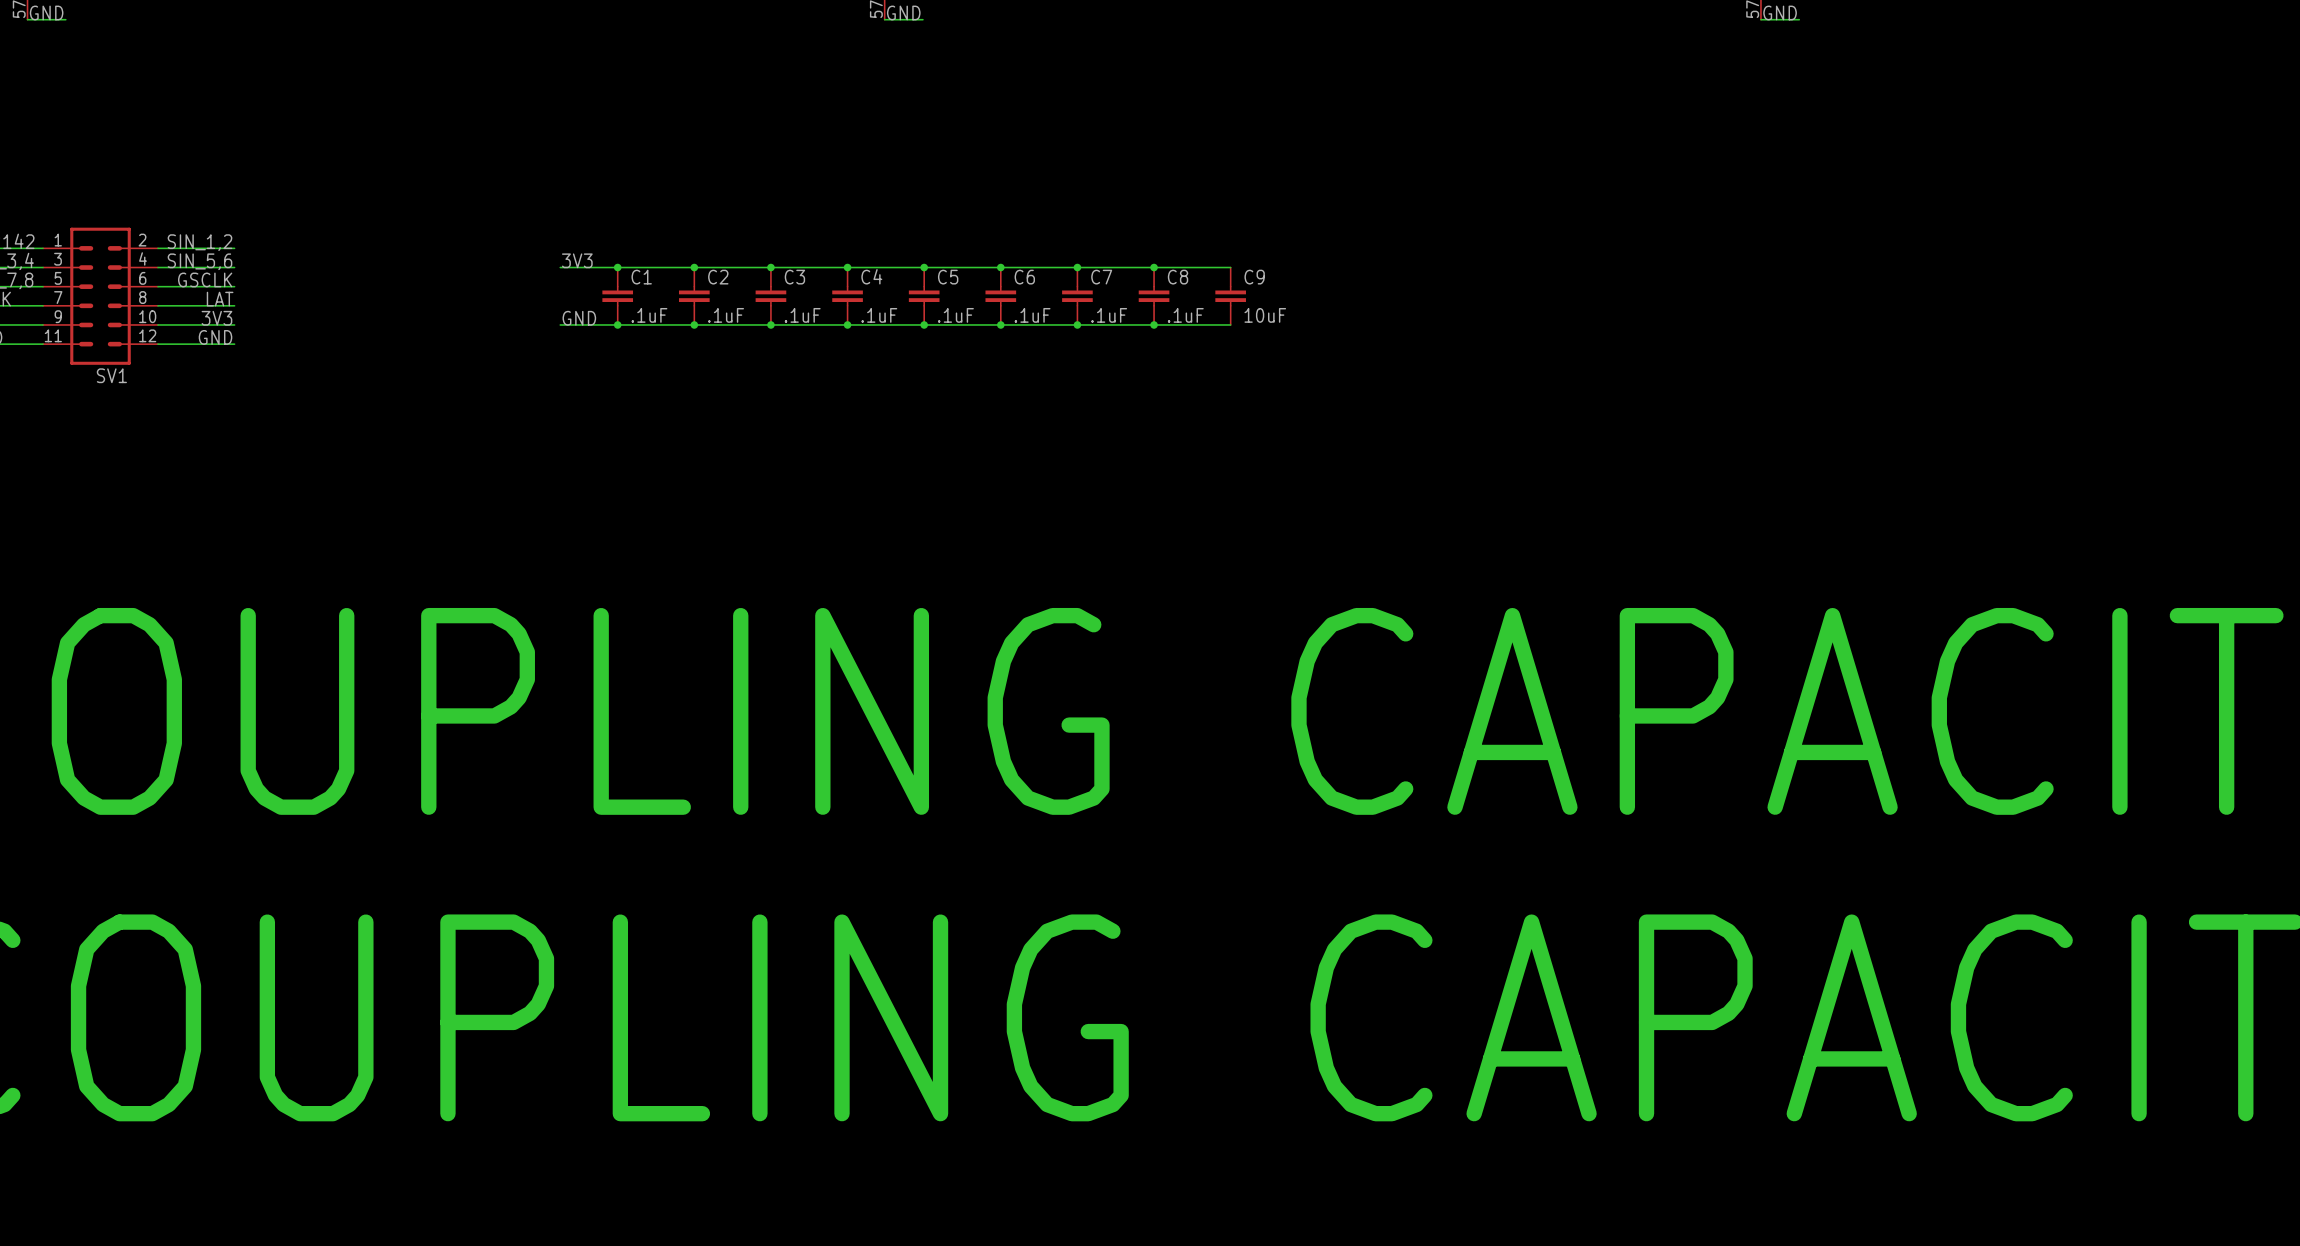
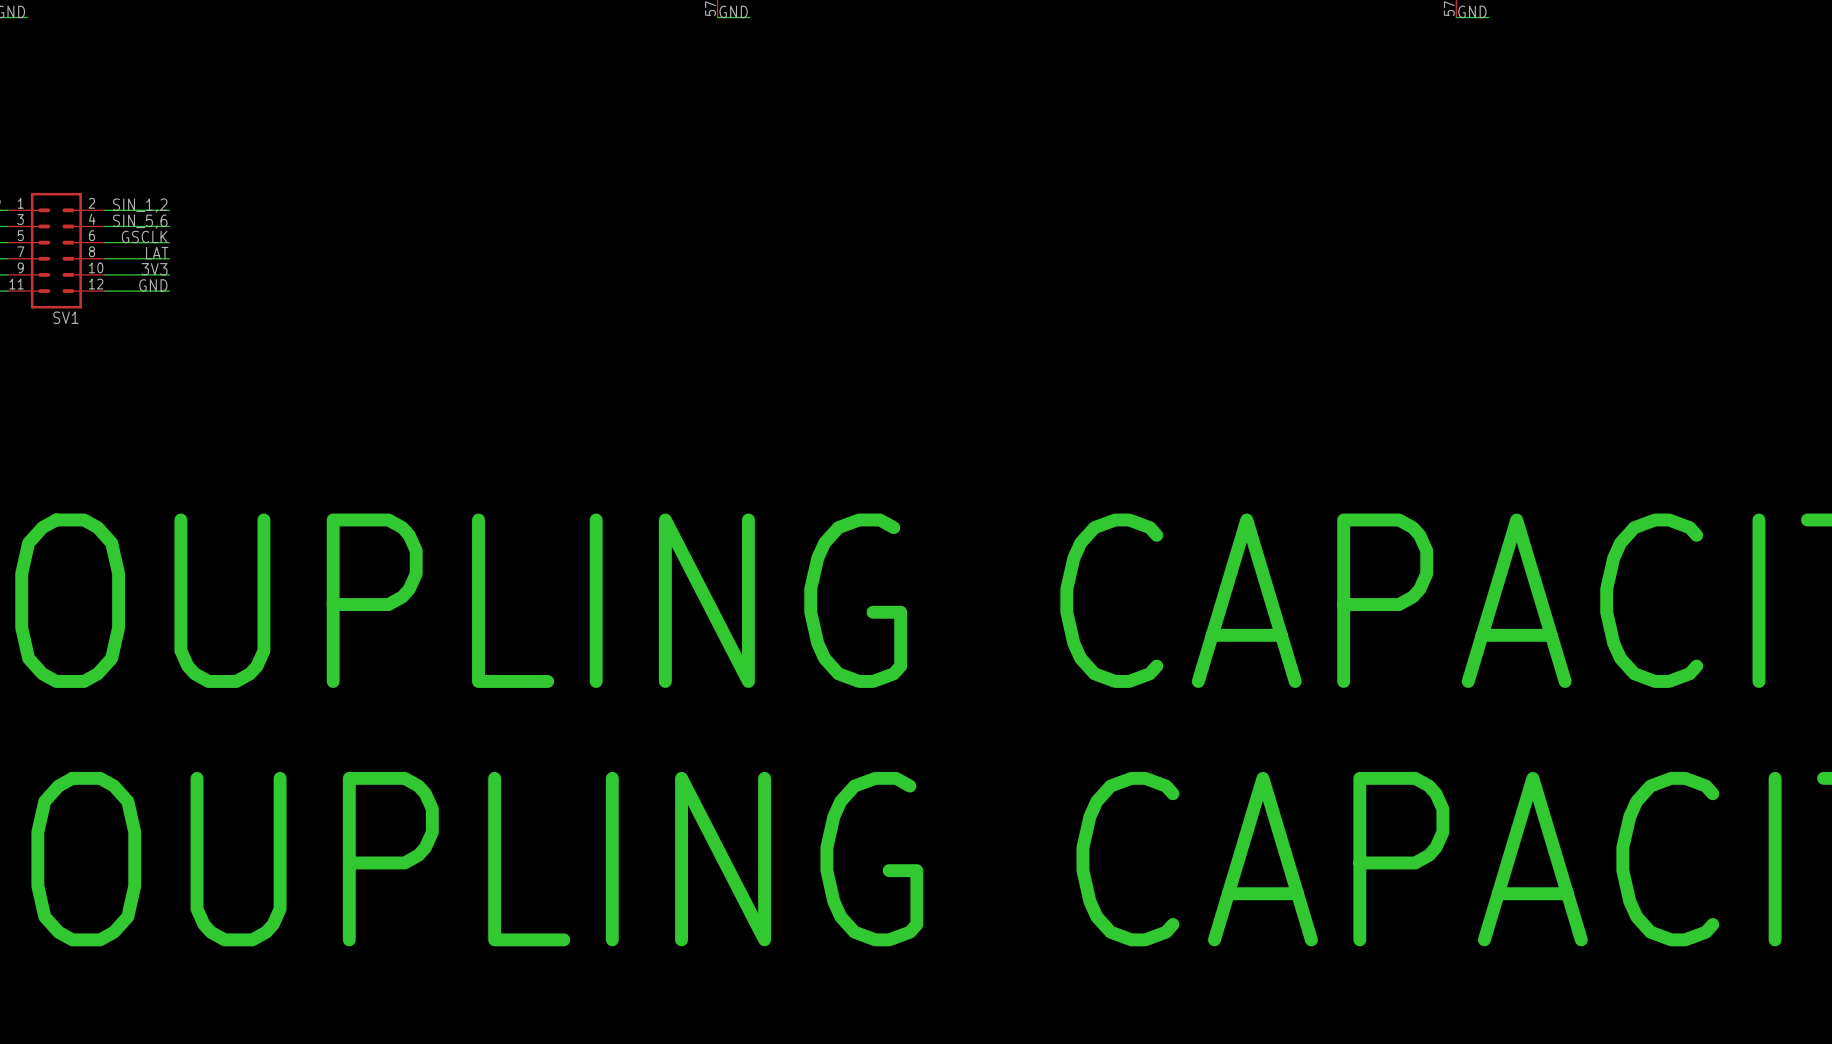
label: 3V3 (577, 260) -> none
wire: (560, 267) (1230, 267) -> none
junction: (617, 267) -> none
junction: (694, 267) -> none
junction: (770, 267) -> none
junction: (847, 267) -> none
junction: (924, 267) -> none
junction: (1000, 267) -> none
junction: (1077, 267) -> none
junction: (1154, 267) -> none
C1: .1uF (617, 296) -> none
C2: .1uF (694, 296) -> none
C3: .1uF (770, 296) -> none
C4: .1uF (847, 296) -> none
C5: .1uF (924, 296) -> none
C6: .1uF (1000, 296) -> none
C7: .1uF (1077, 296) -> none
C8: .1uF (1154, 296) -> none
C9: 10uF (1230, 296) -> none
label: GND (579, 318) -> none
wire: (560, 324) (1230, 324) -> none
junction: (617, 324) -> none
junction: (694, 324) -> none
junction: (770, 324) -> none
junction: (847, 324) -> none
junction: (924, 324) -> none
junction: (1000, 324) -> none
junction: (1077, 324) -> none
junction: (1154, 324) -> none

